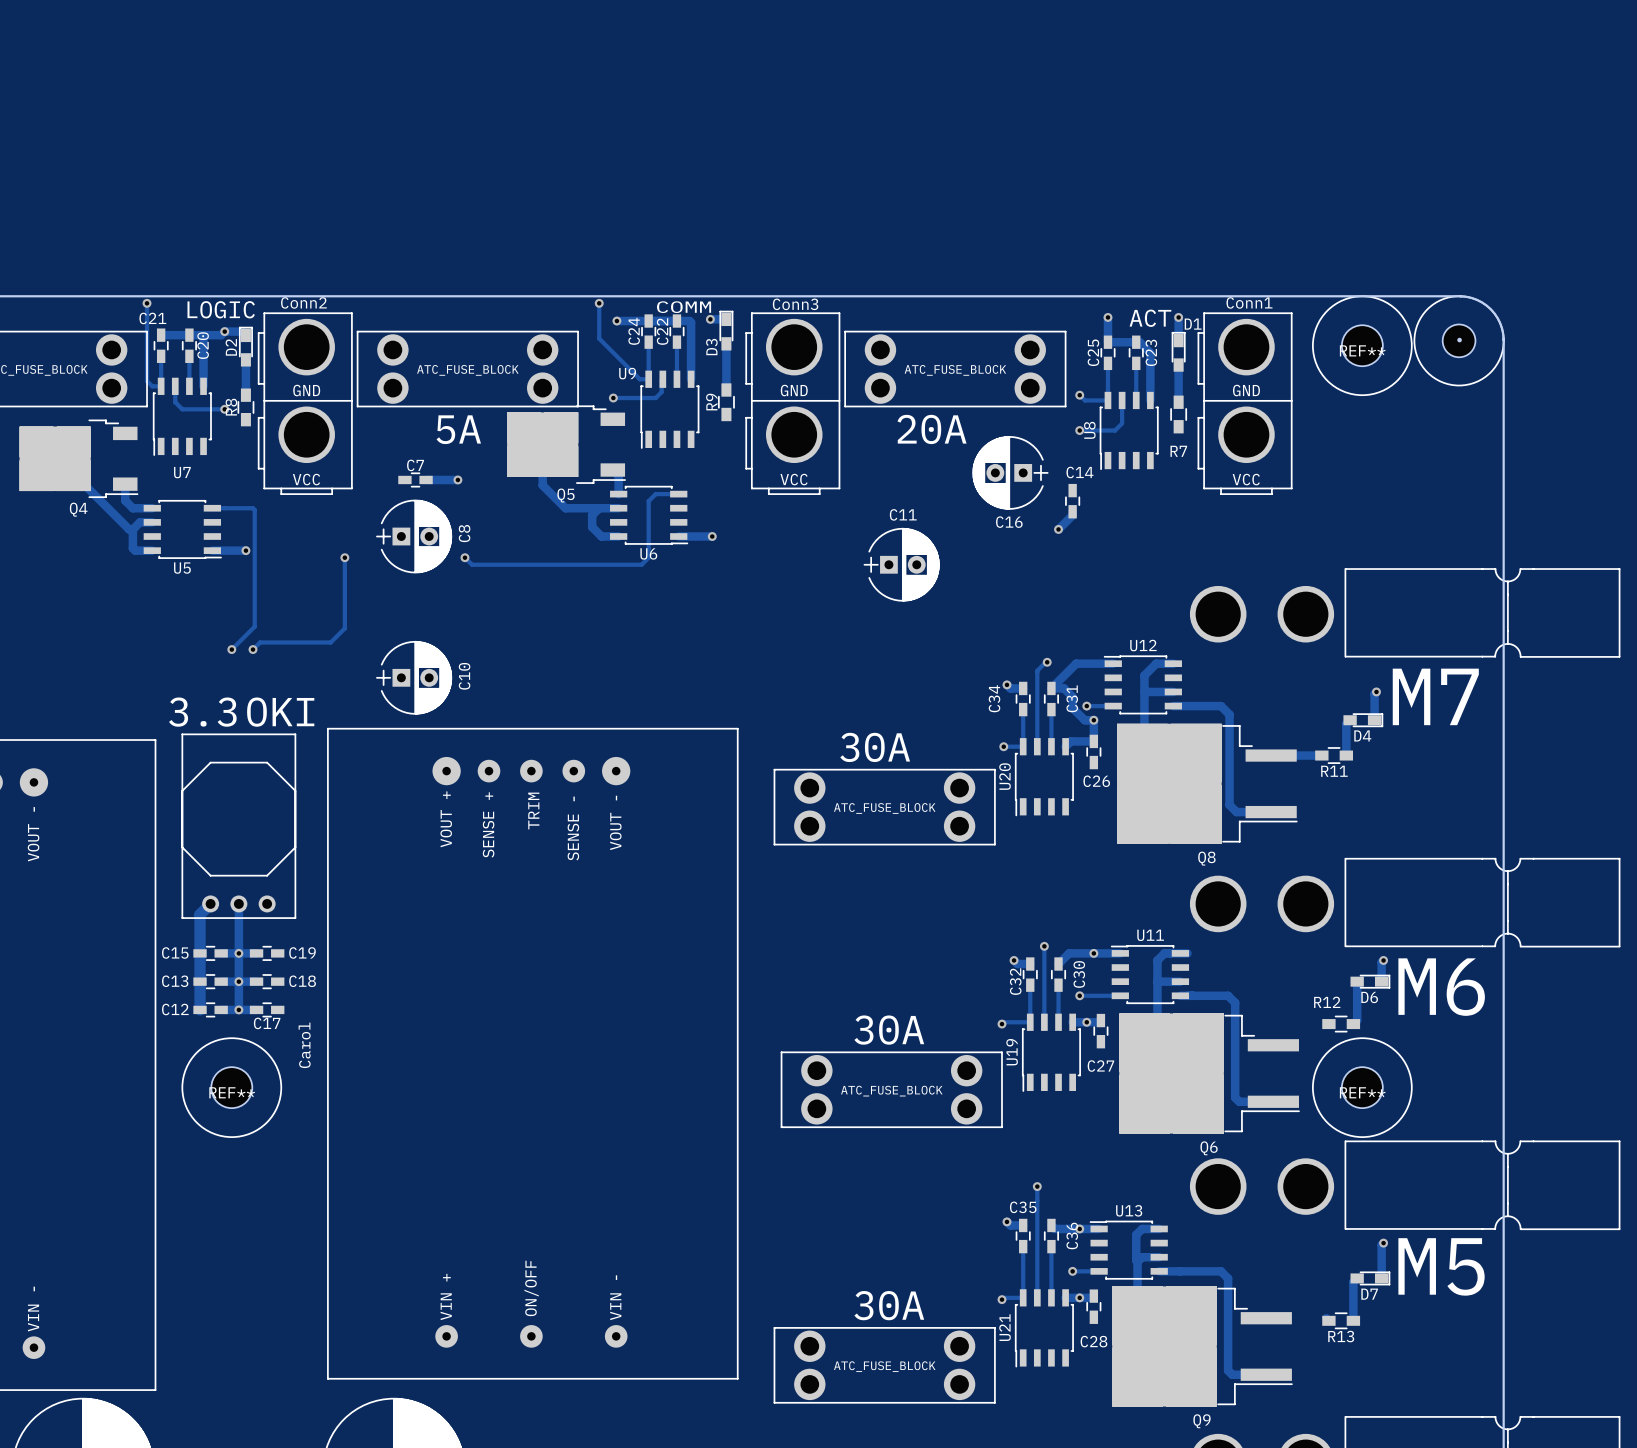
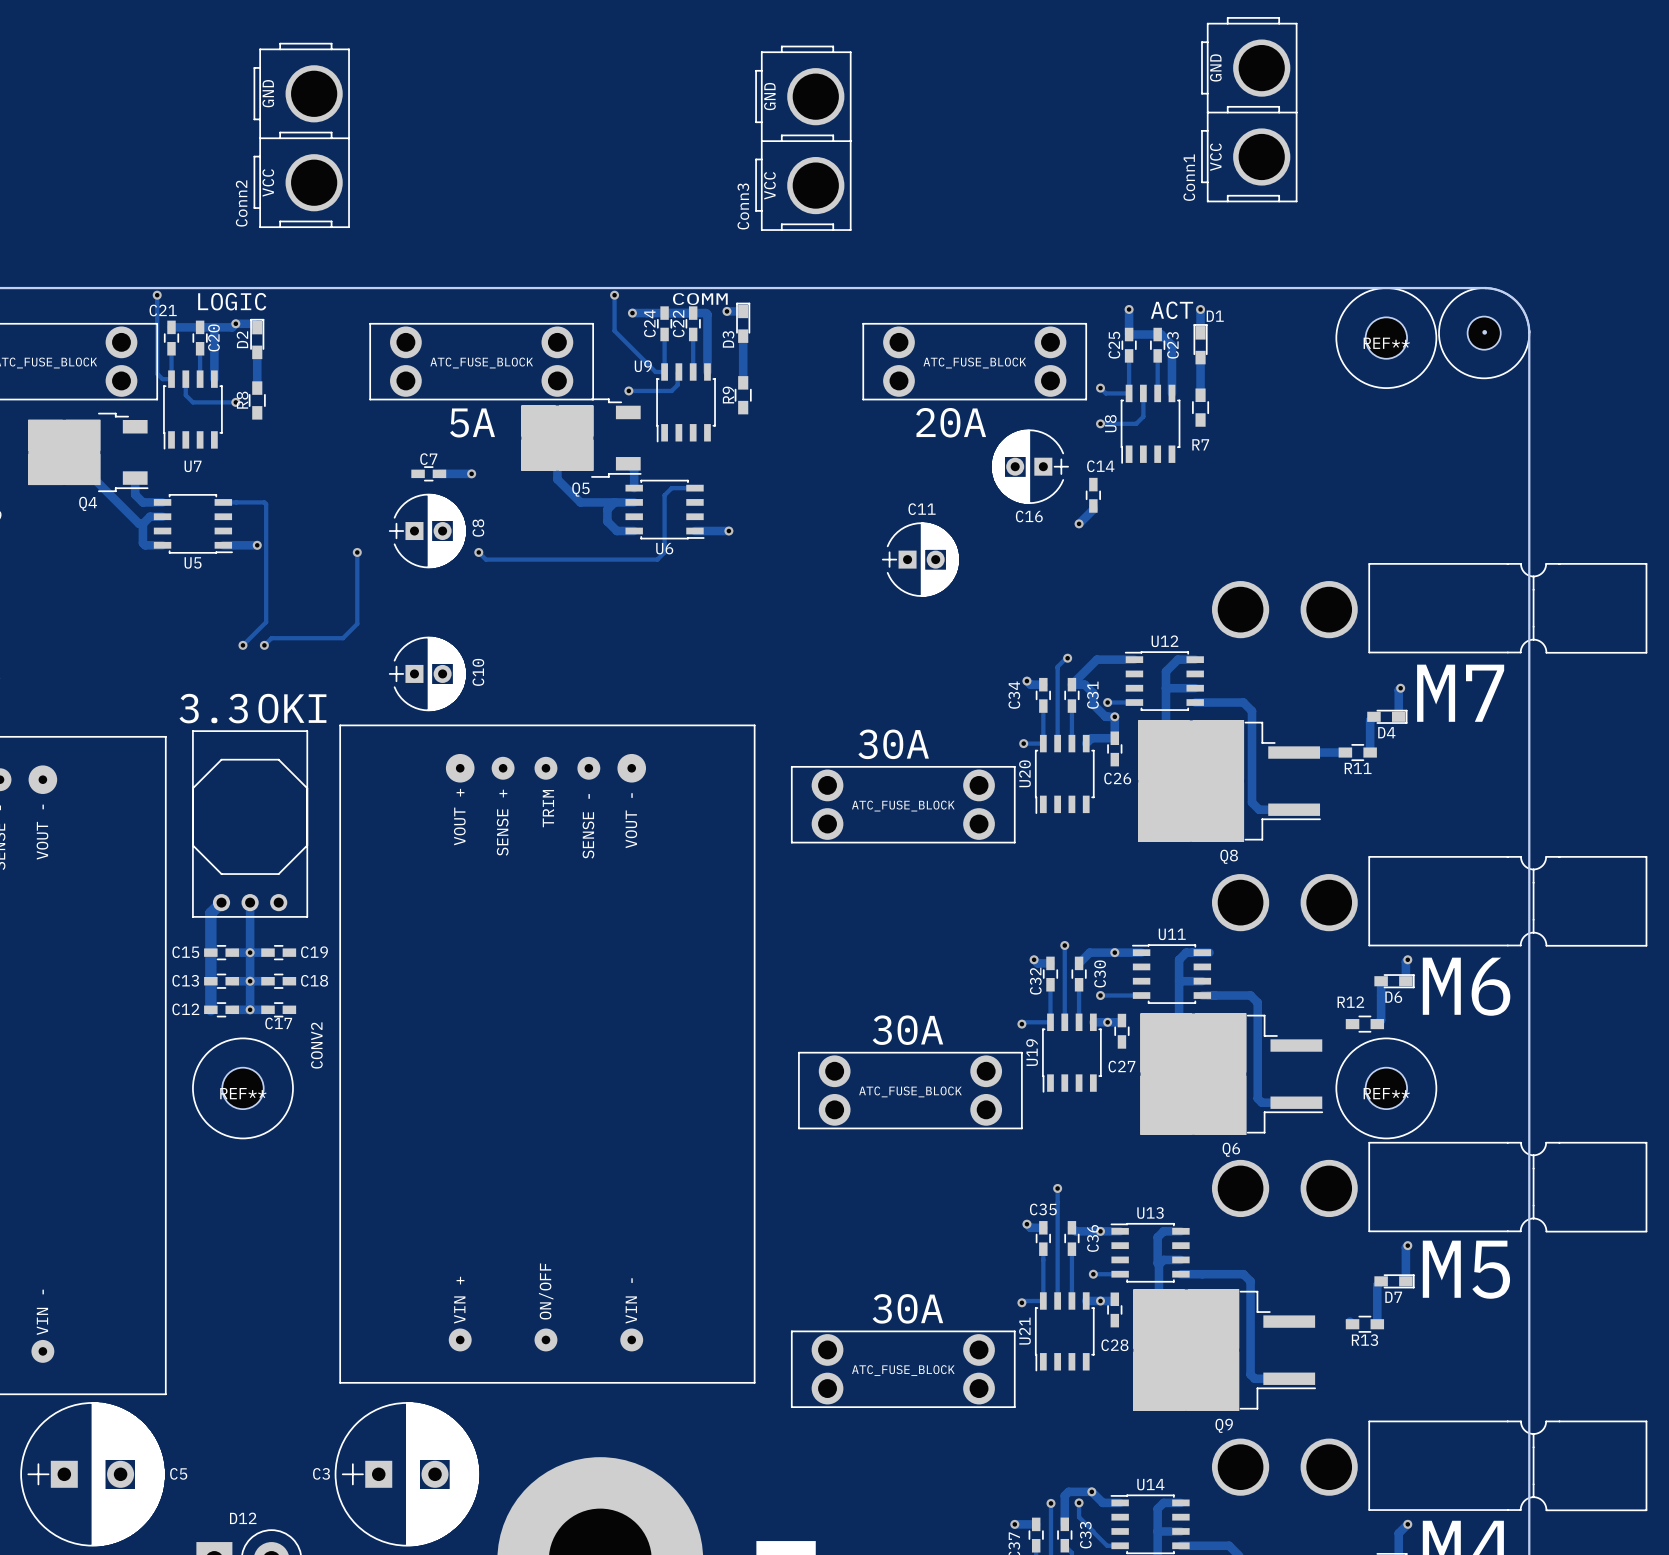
Conn2 name position: Conn2 (303, 302) -> Conn2 (241, 203)
Conn1 name position: Conn1 (1249, 302) -> Conn1 (1189, 177)
Conn3 name position: Conn3 (795, 304) -> Conn3 (743, 206)
Conn2 footprint: [257, 312, 353, 495] -> [253, 42, 350, 229]
Conn3 footprint: [745, 312, 841, 495] -> [755, 45, 852, 231]
Conn1 footprint: [1197, 312, 1293, 495] -> [1201, 17, 1298, 203]
Carol name: Carol (304, 1045) -> CONV2 (316, 1045)

